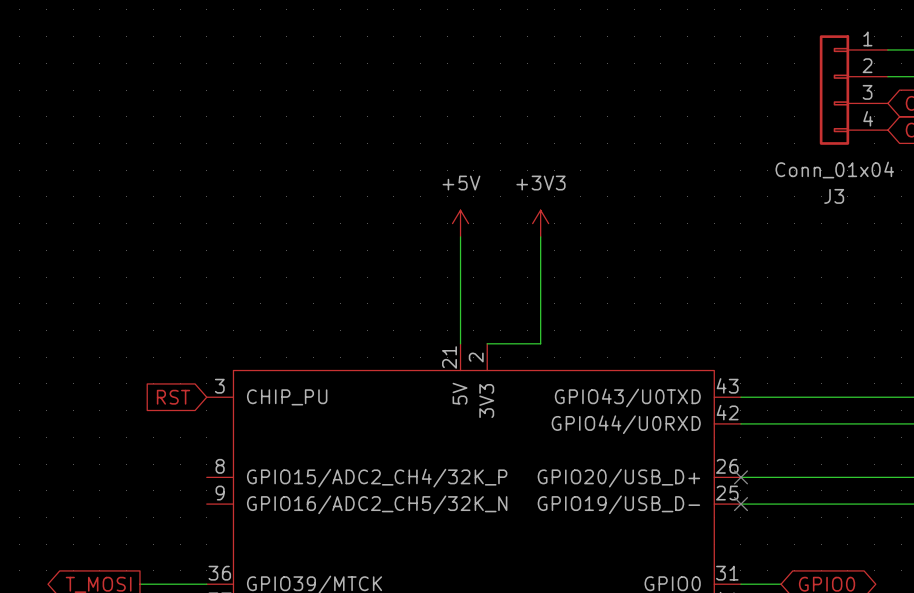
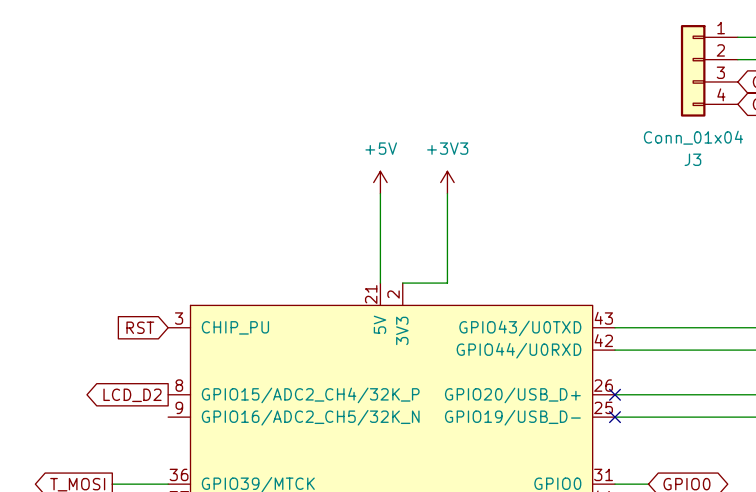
global label: none -> LCD_D2 (132, 395)

